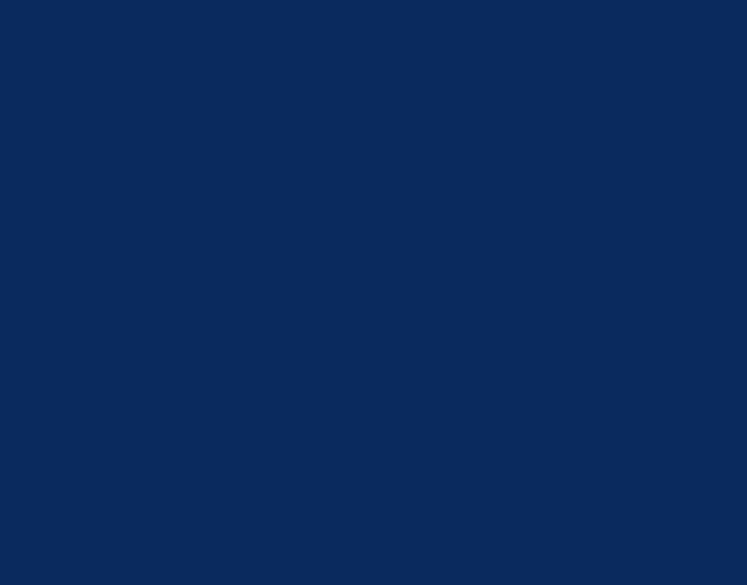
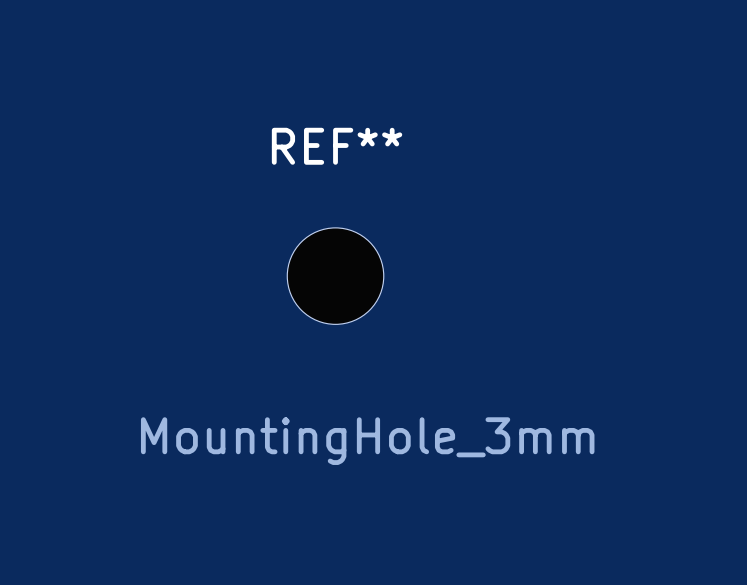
REF**: none -> MountingHole_3mm (335, 276)

